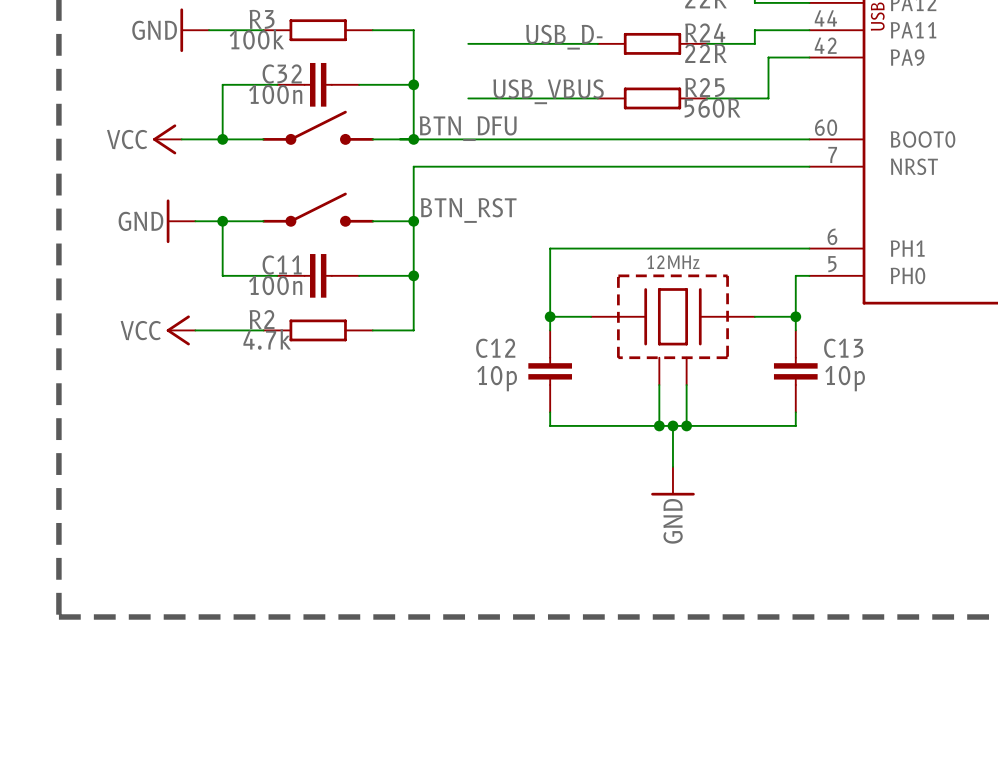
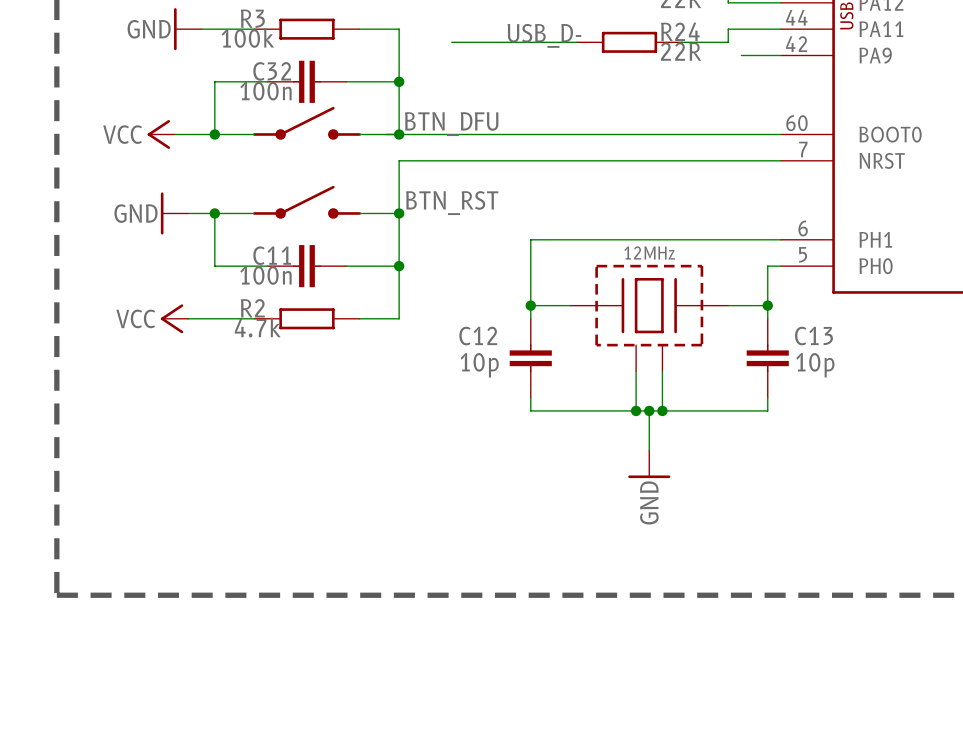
wire: (768, 57) (768, 98) (707, 98) -> none
label: USB_VBUS (548, 91) -> none
wire: (468, 98) (597, 98) -> none
R25: 560R (652, 98) -> none

